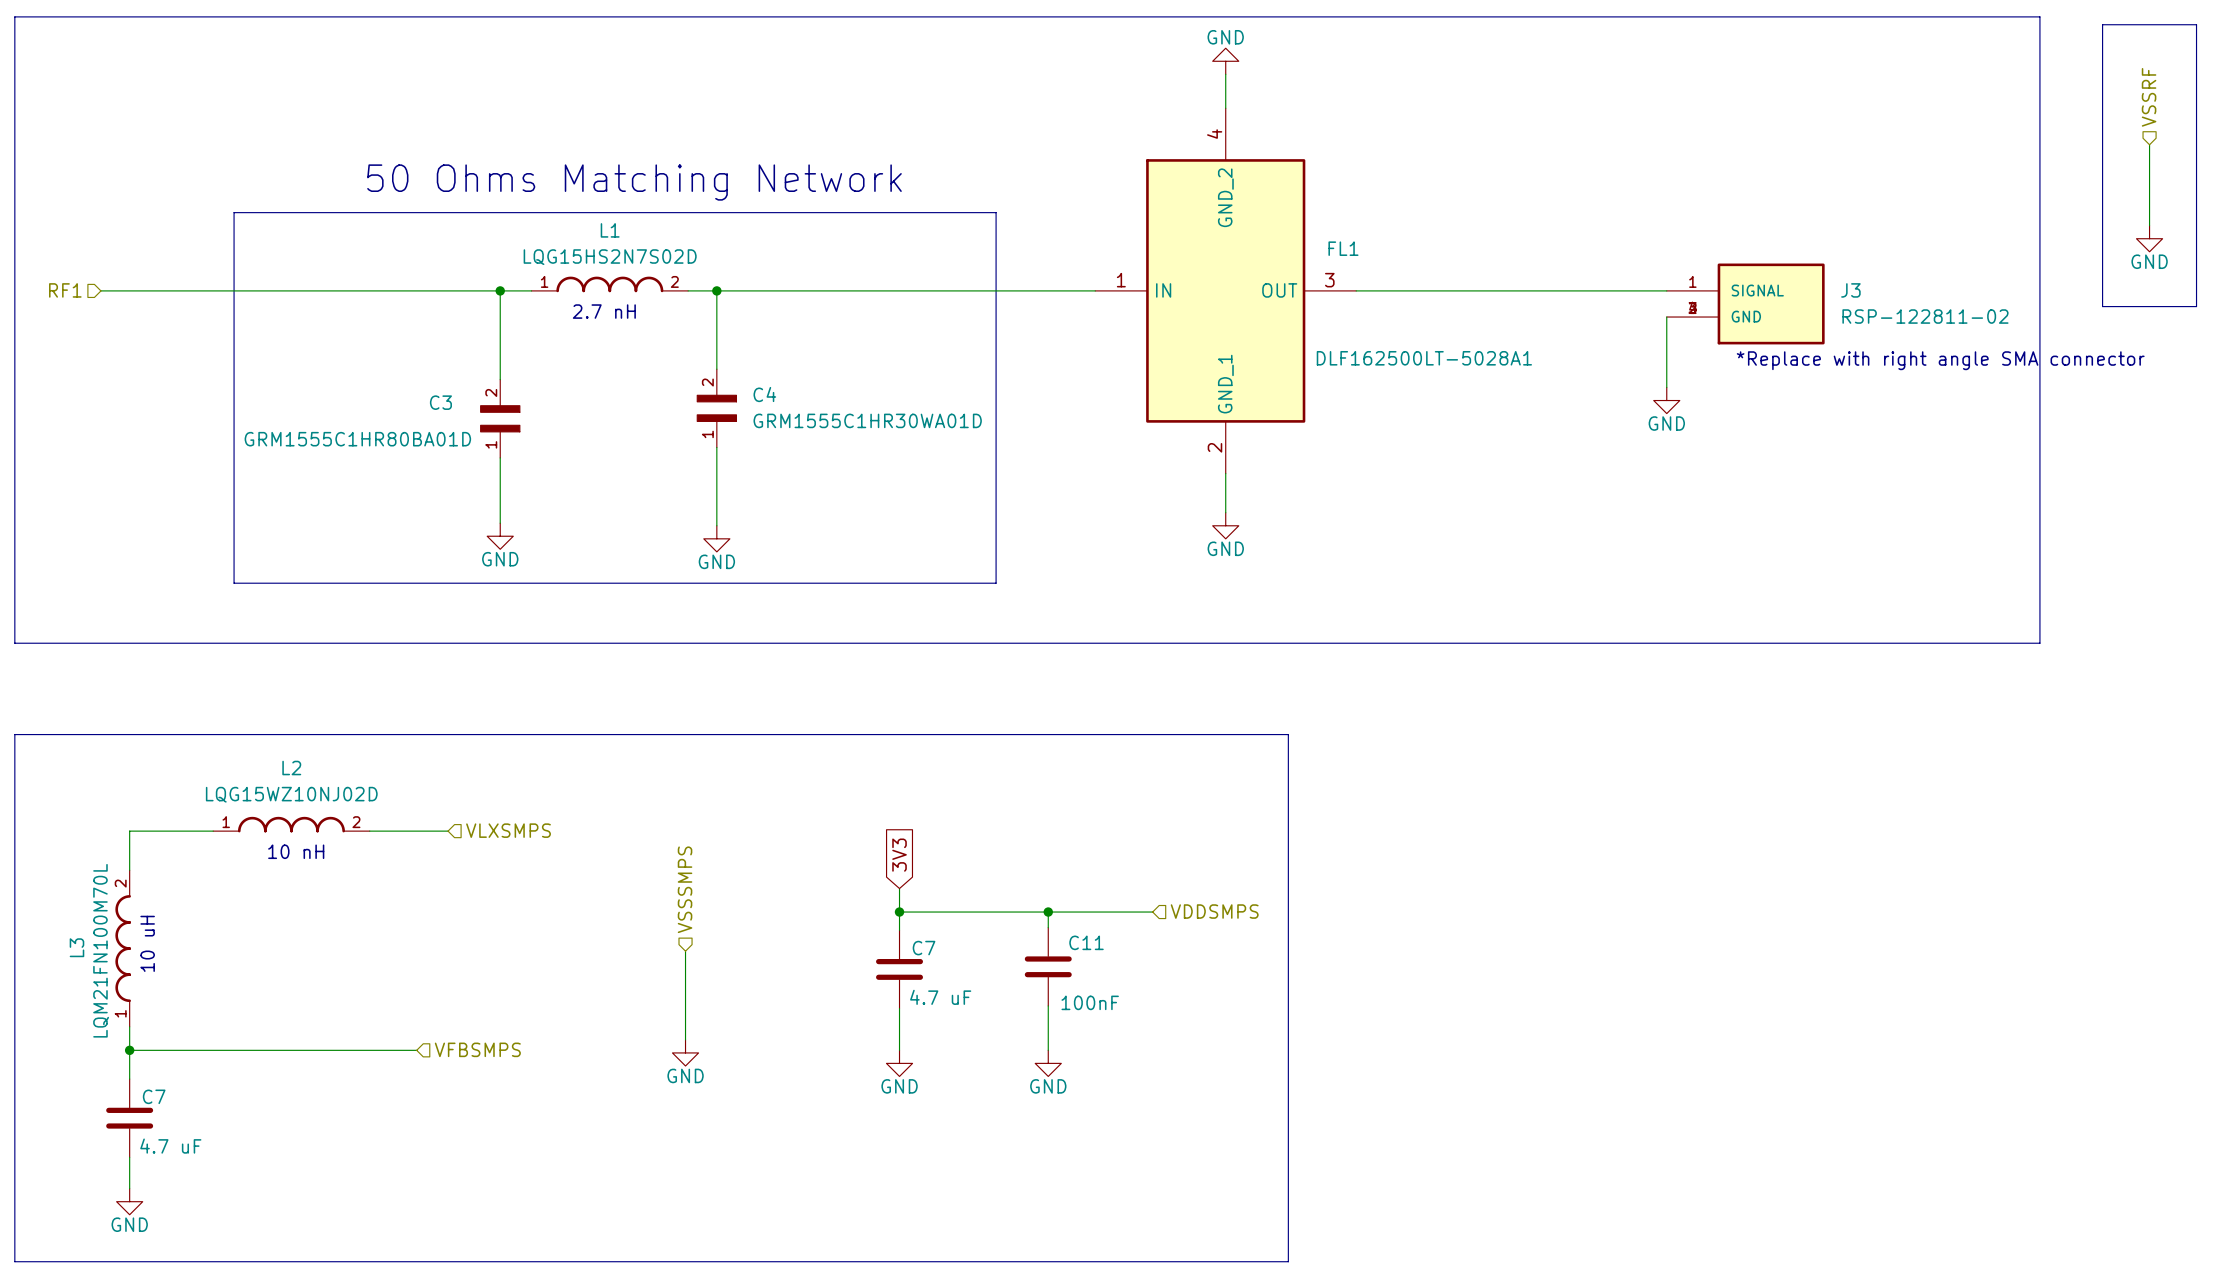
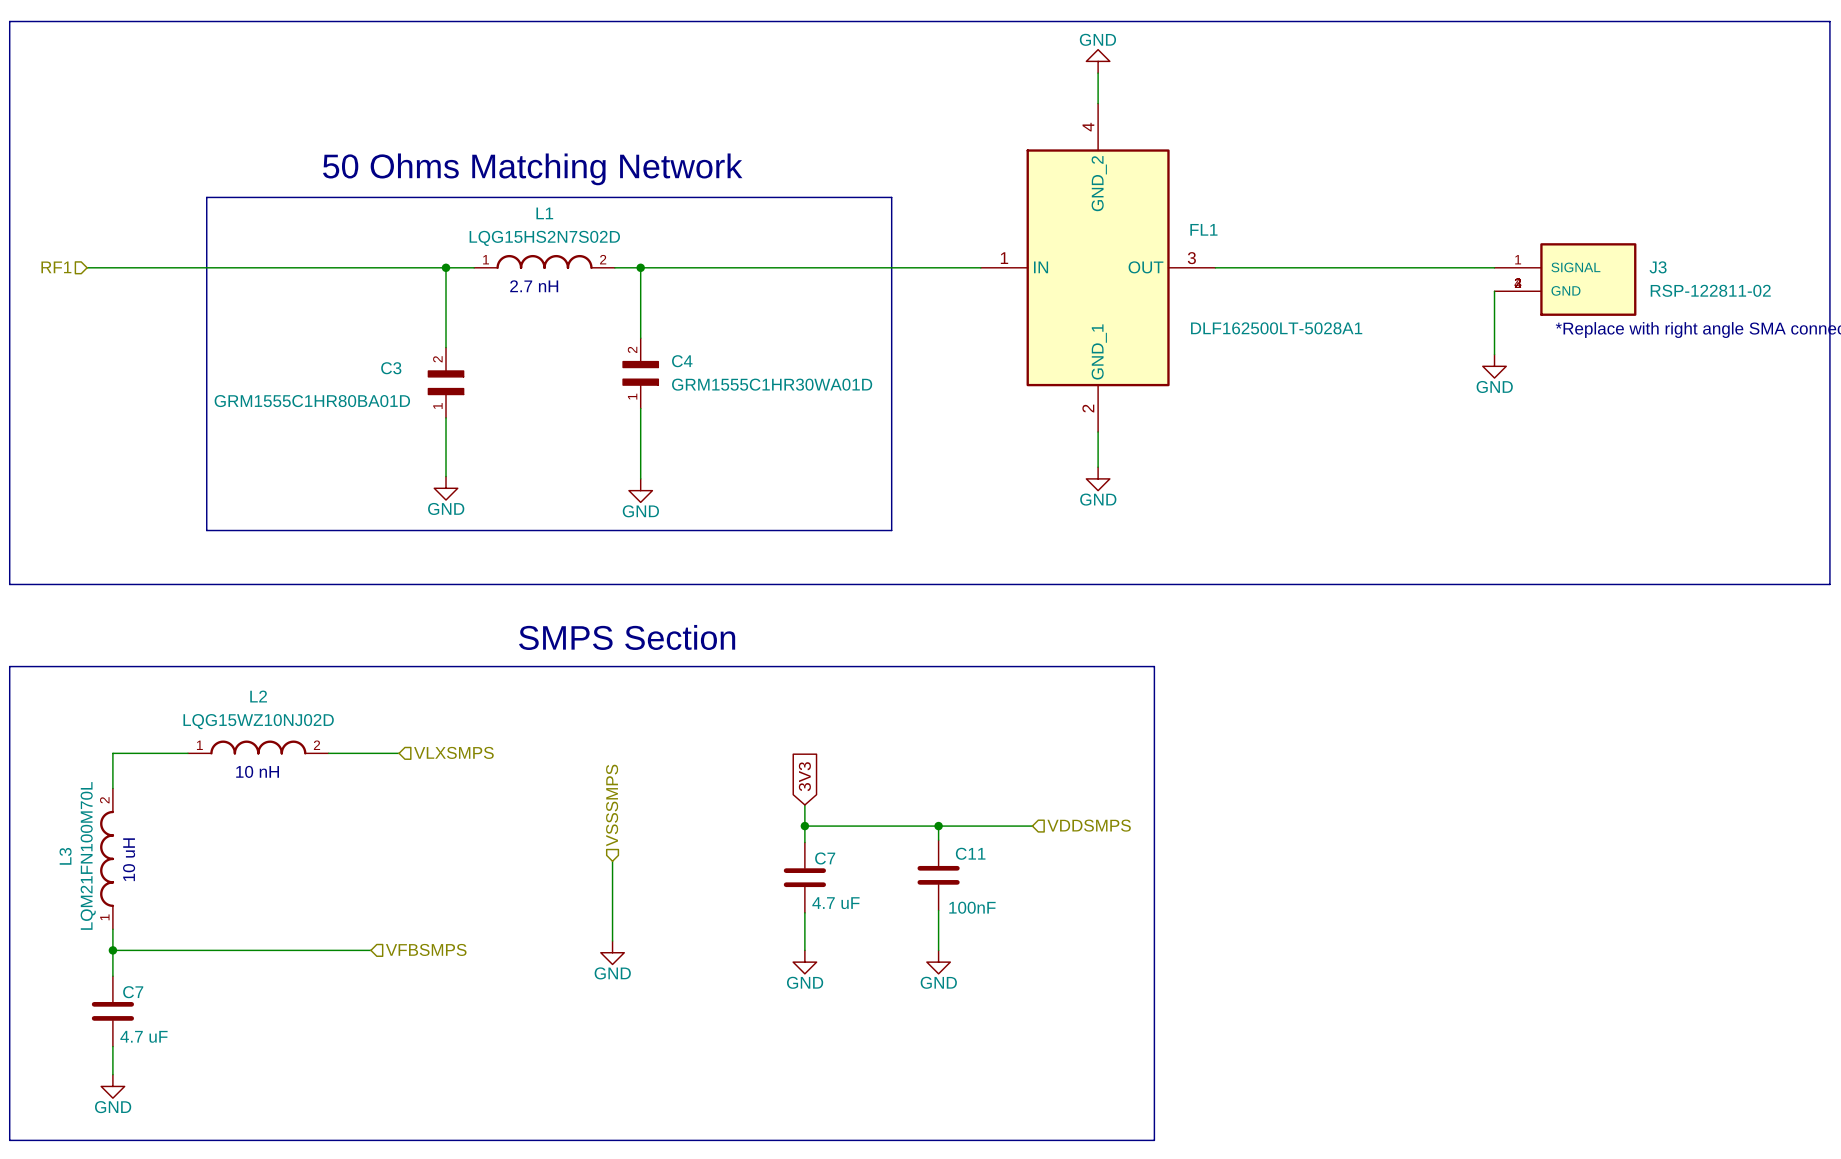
text: none -> SMPS Section (627, 637)

